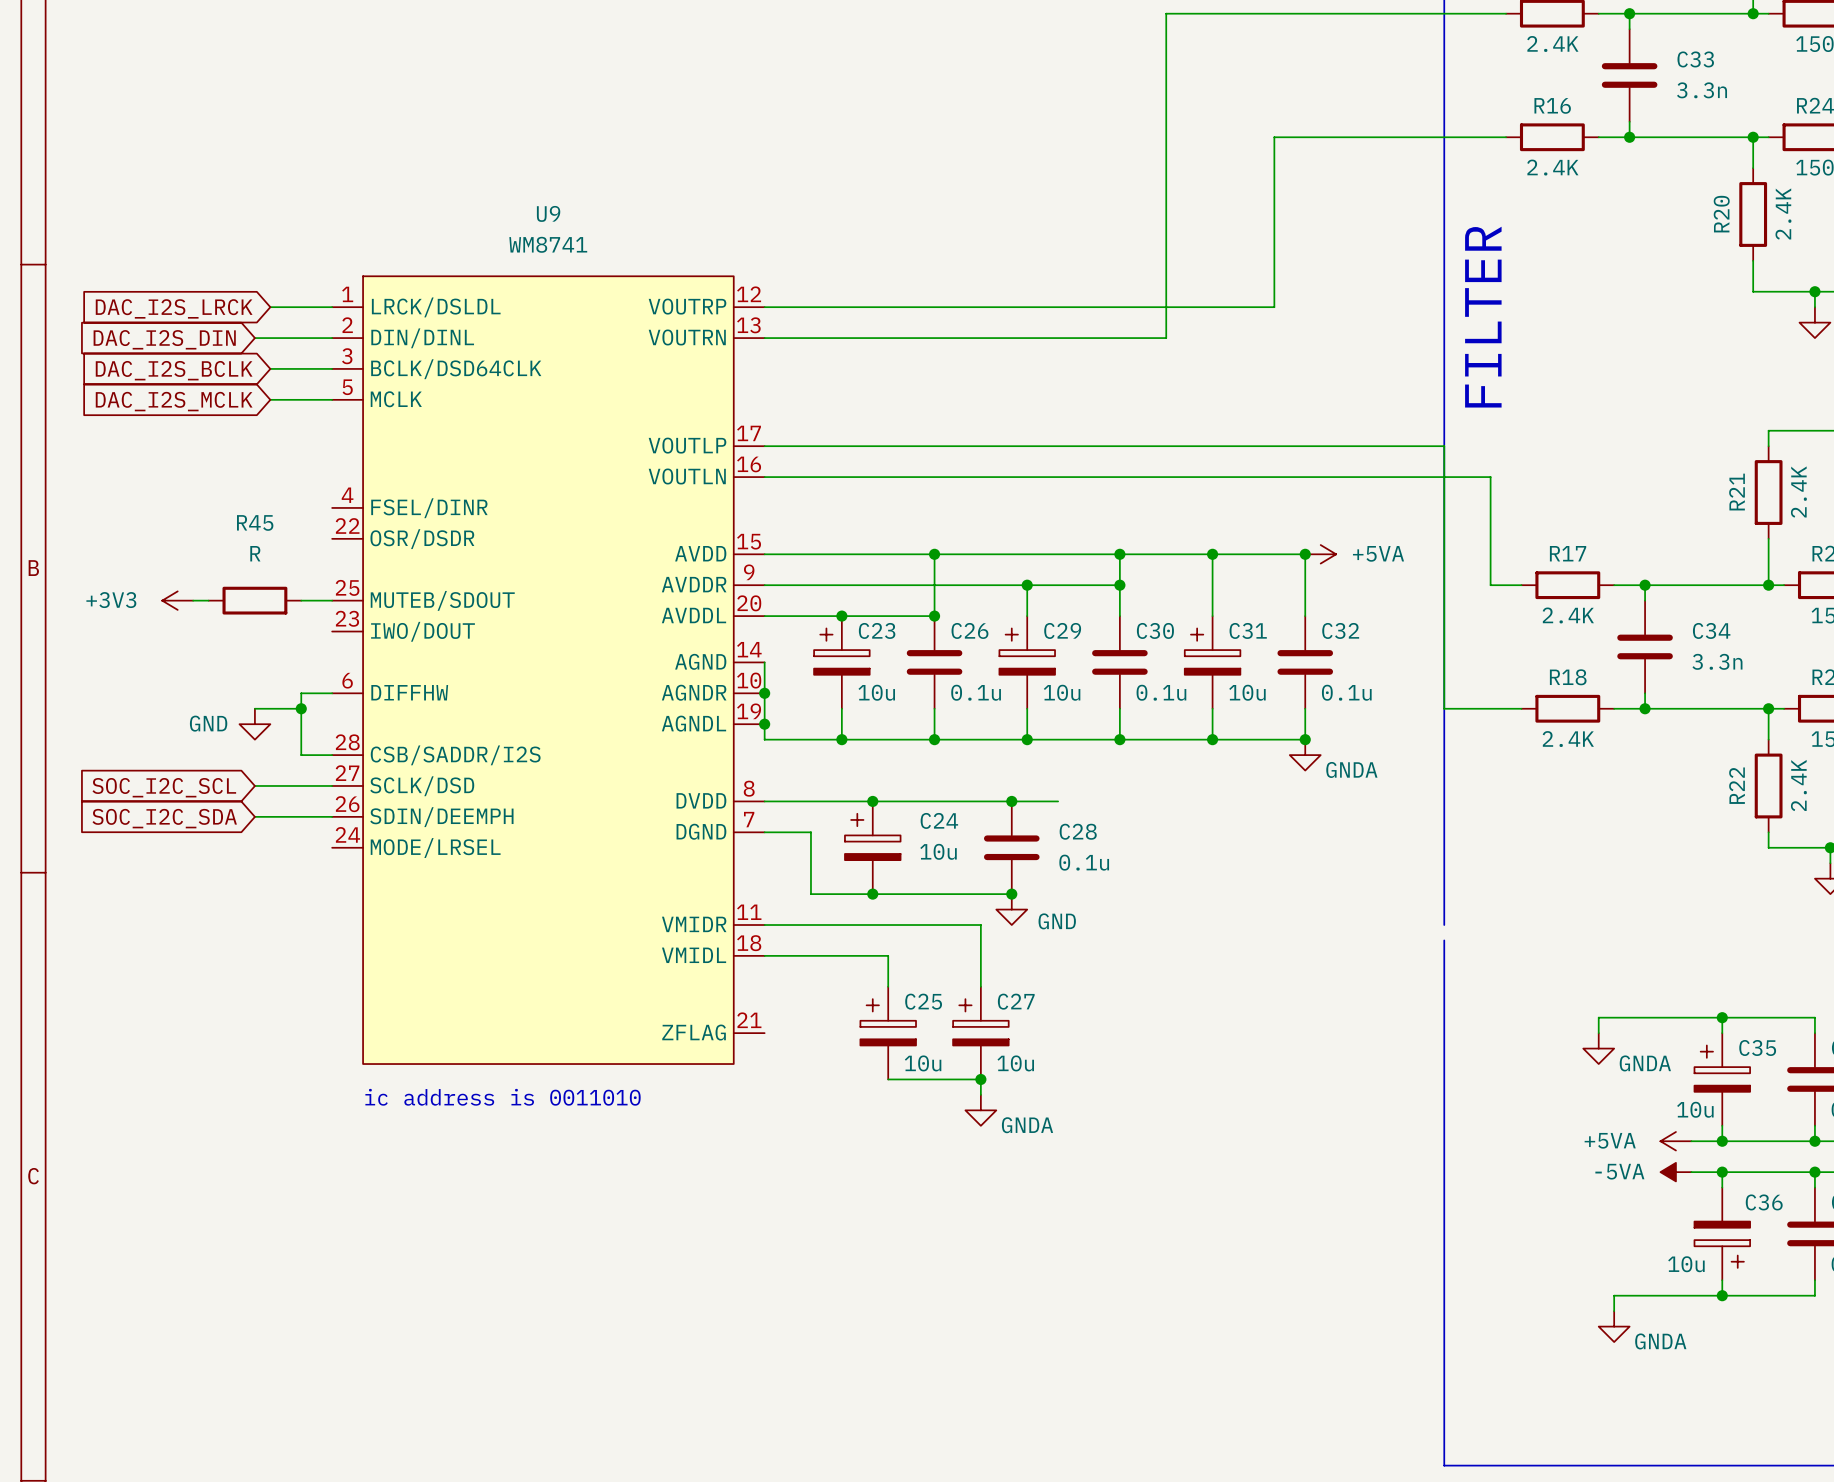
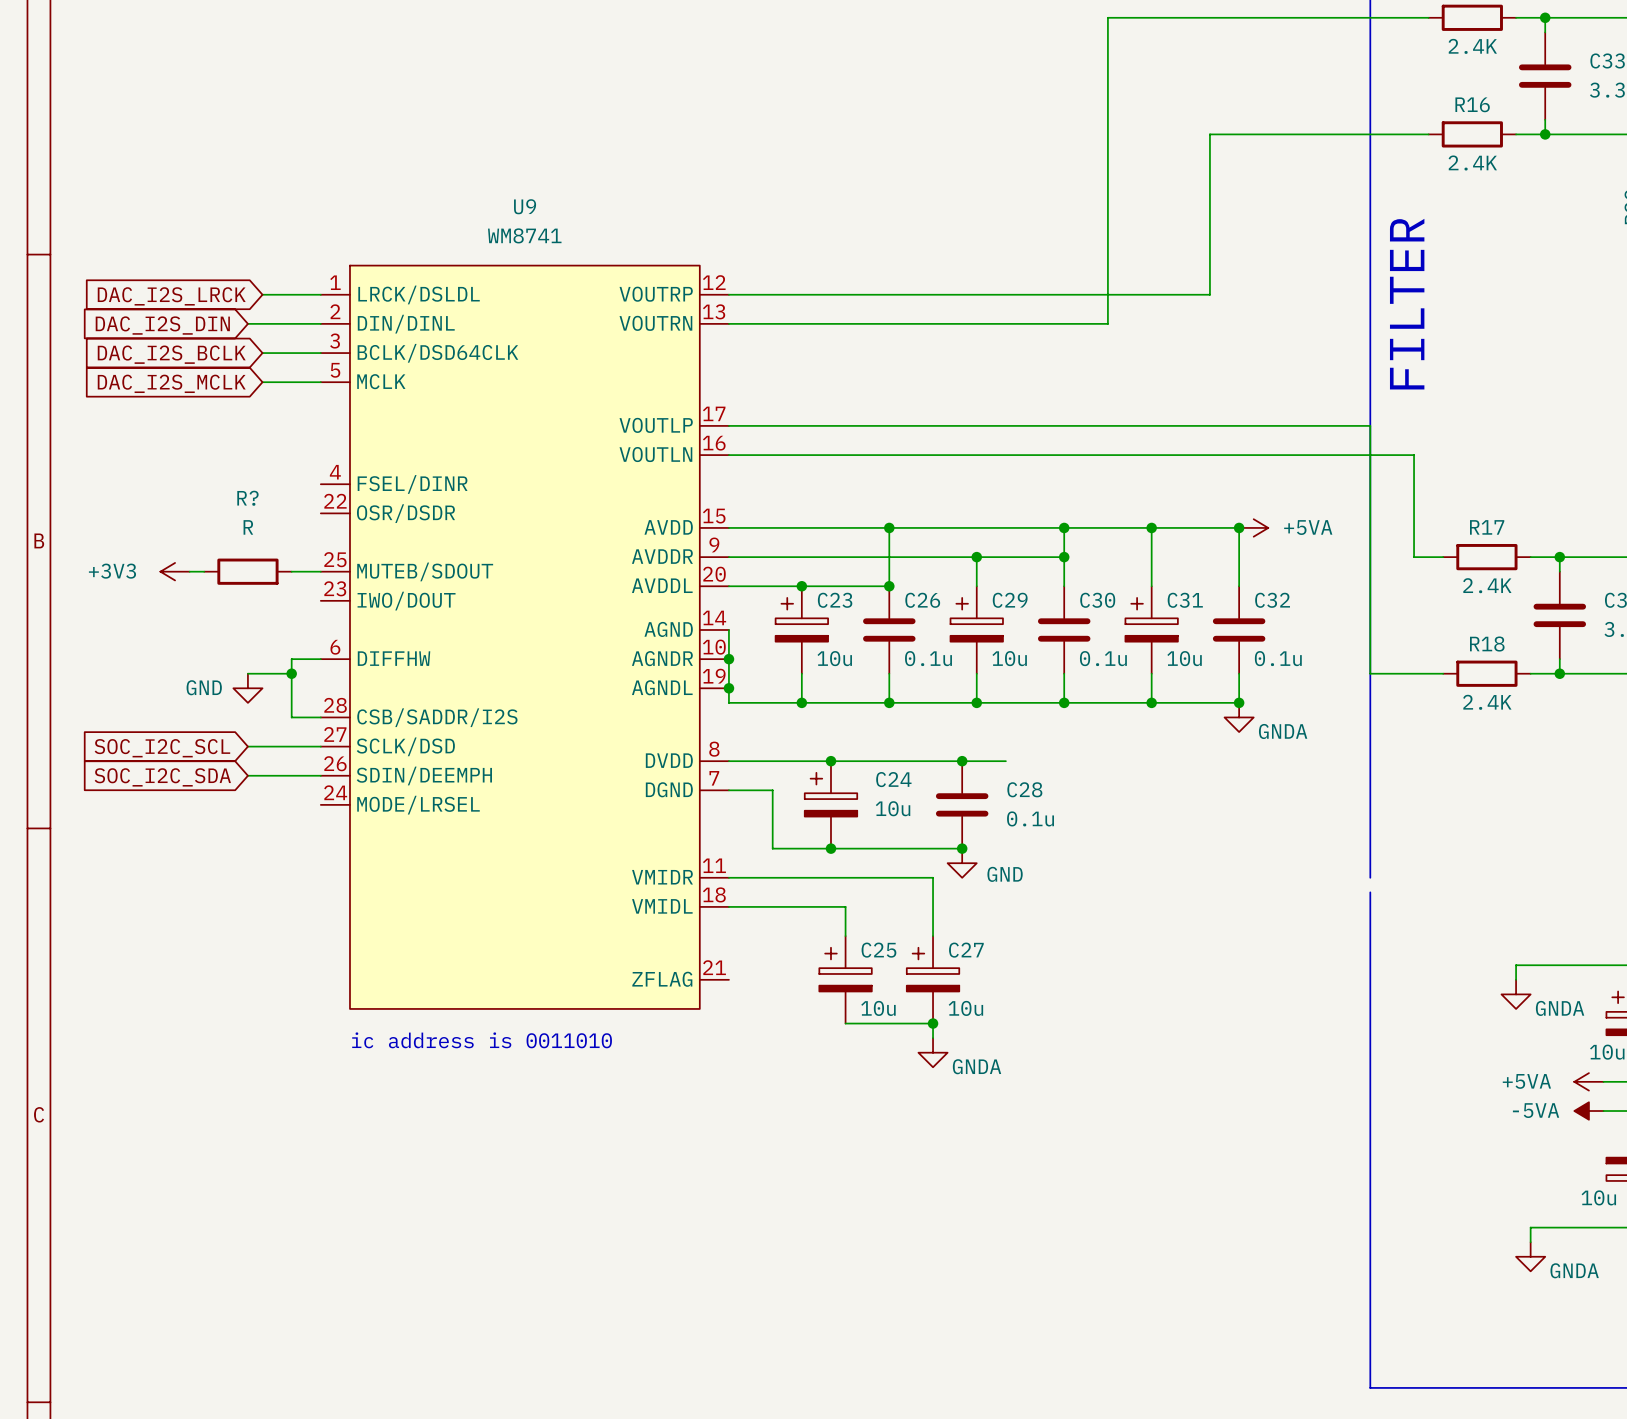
R45 name: R45 (255, 522) -> R? (247, 498)

